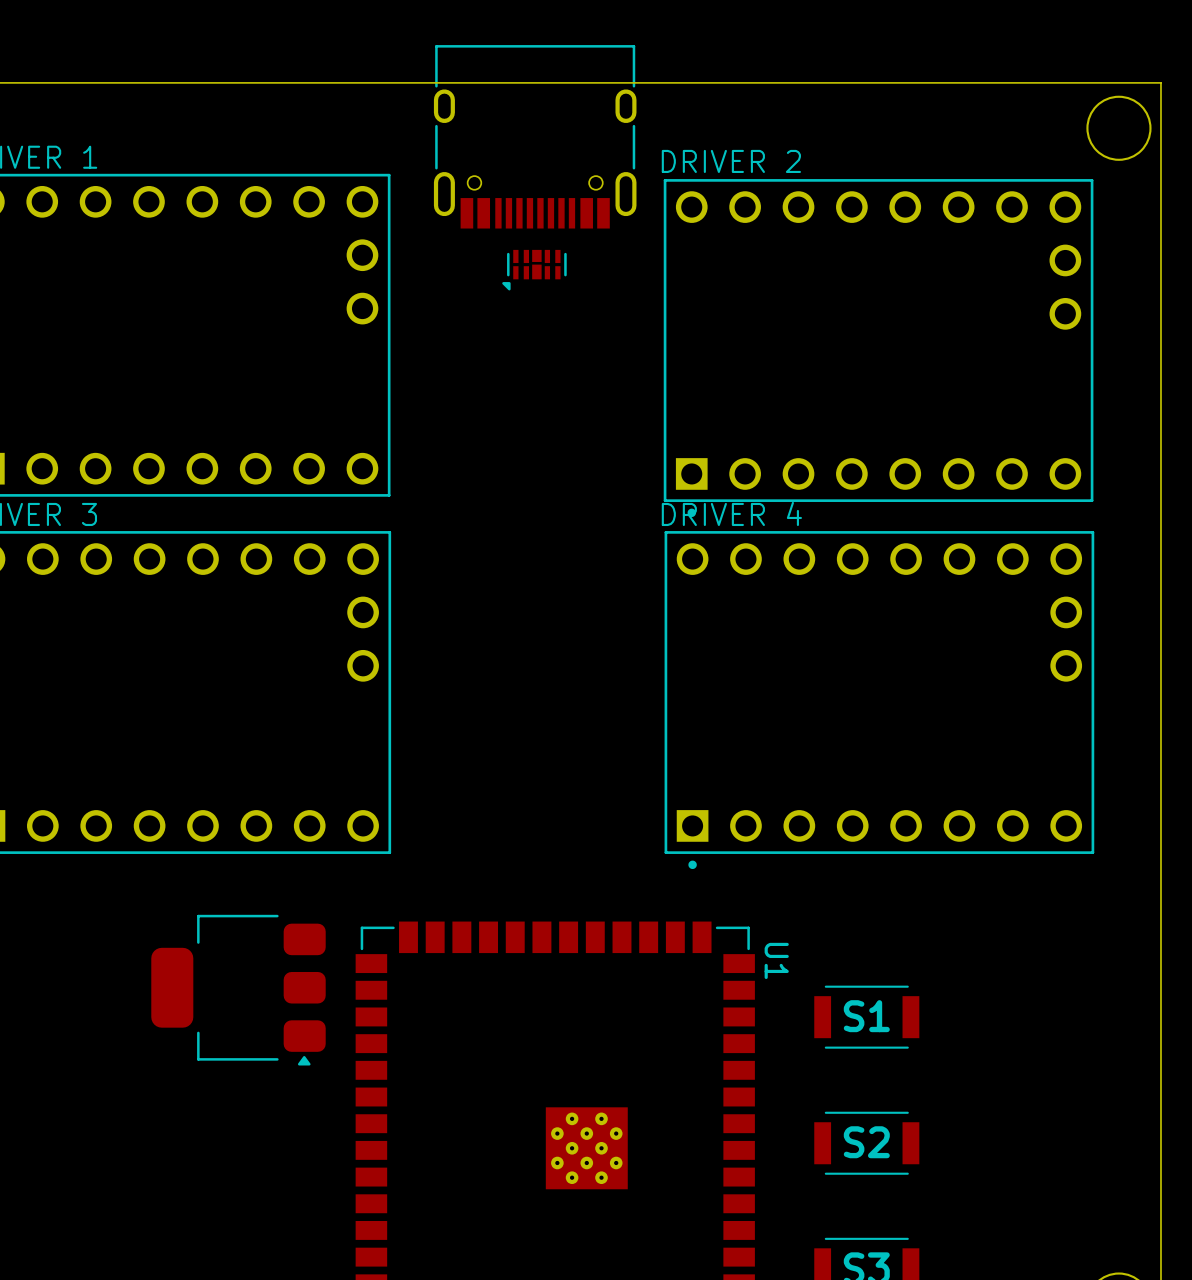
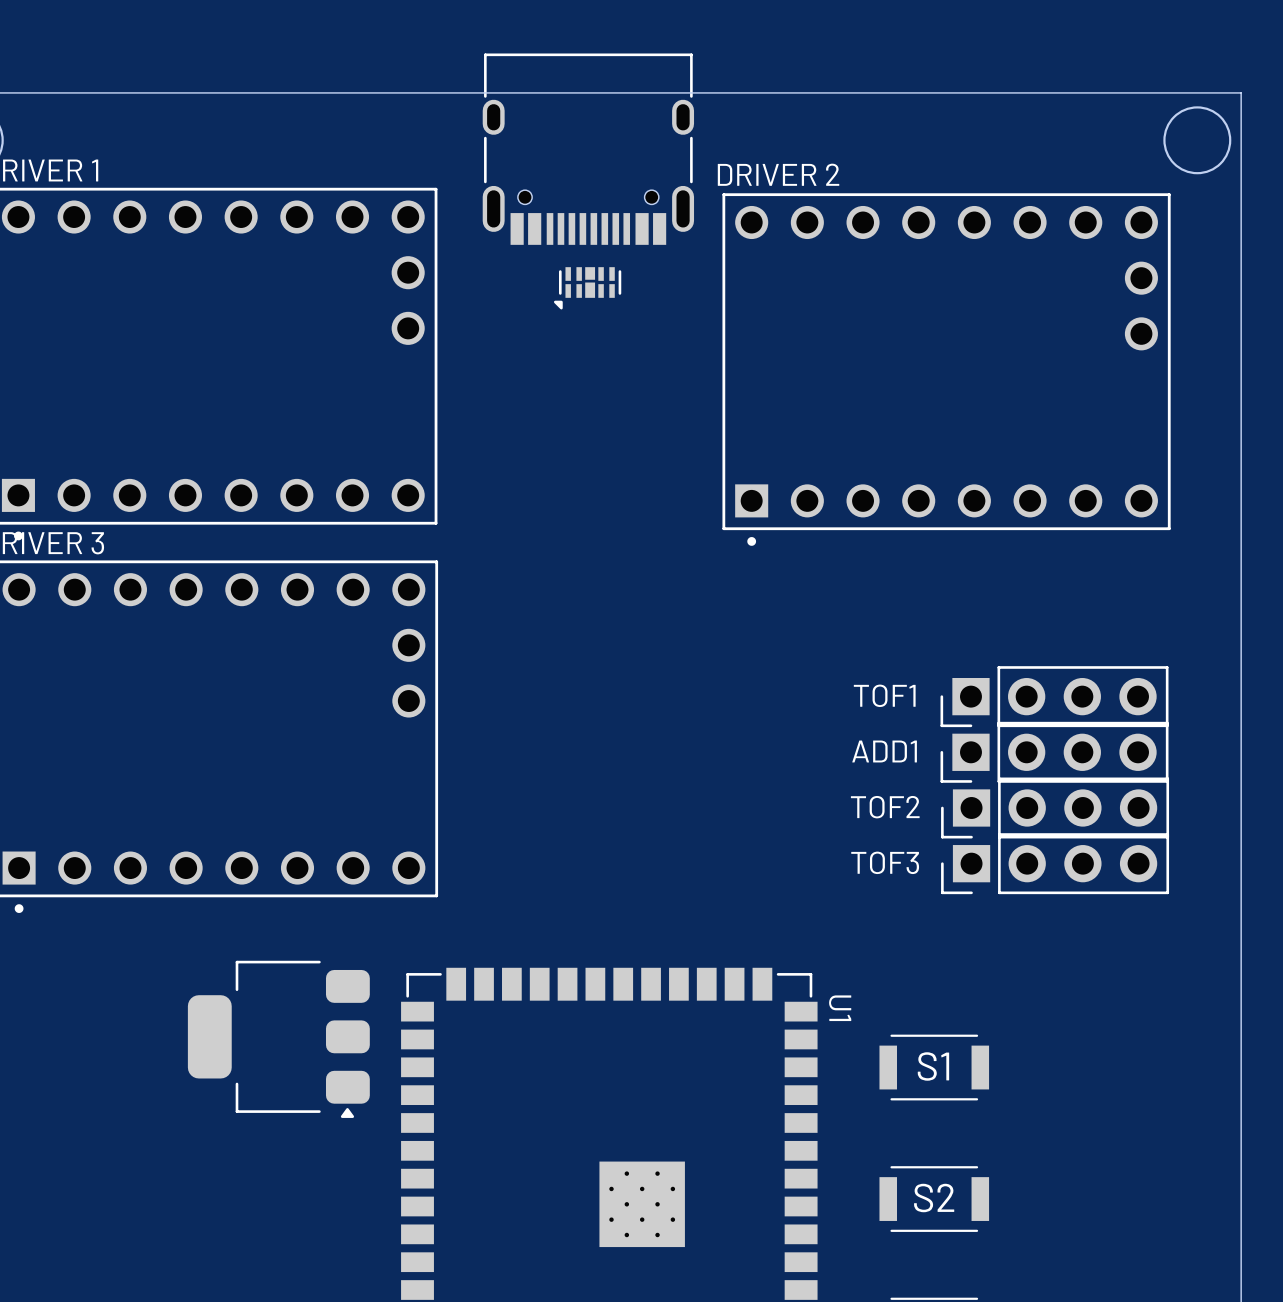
text: DRIVER 4 (731, 513) -> none
TOF1: none -> (1054, 696)
part: (879, 700) -> none
ADD1: none -> (1054, 752)
TOF2: none -> (1055, 807)
TOF3: none -> (1055, 863)

